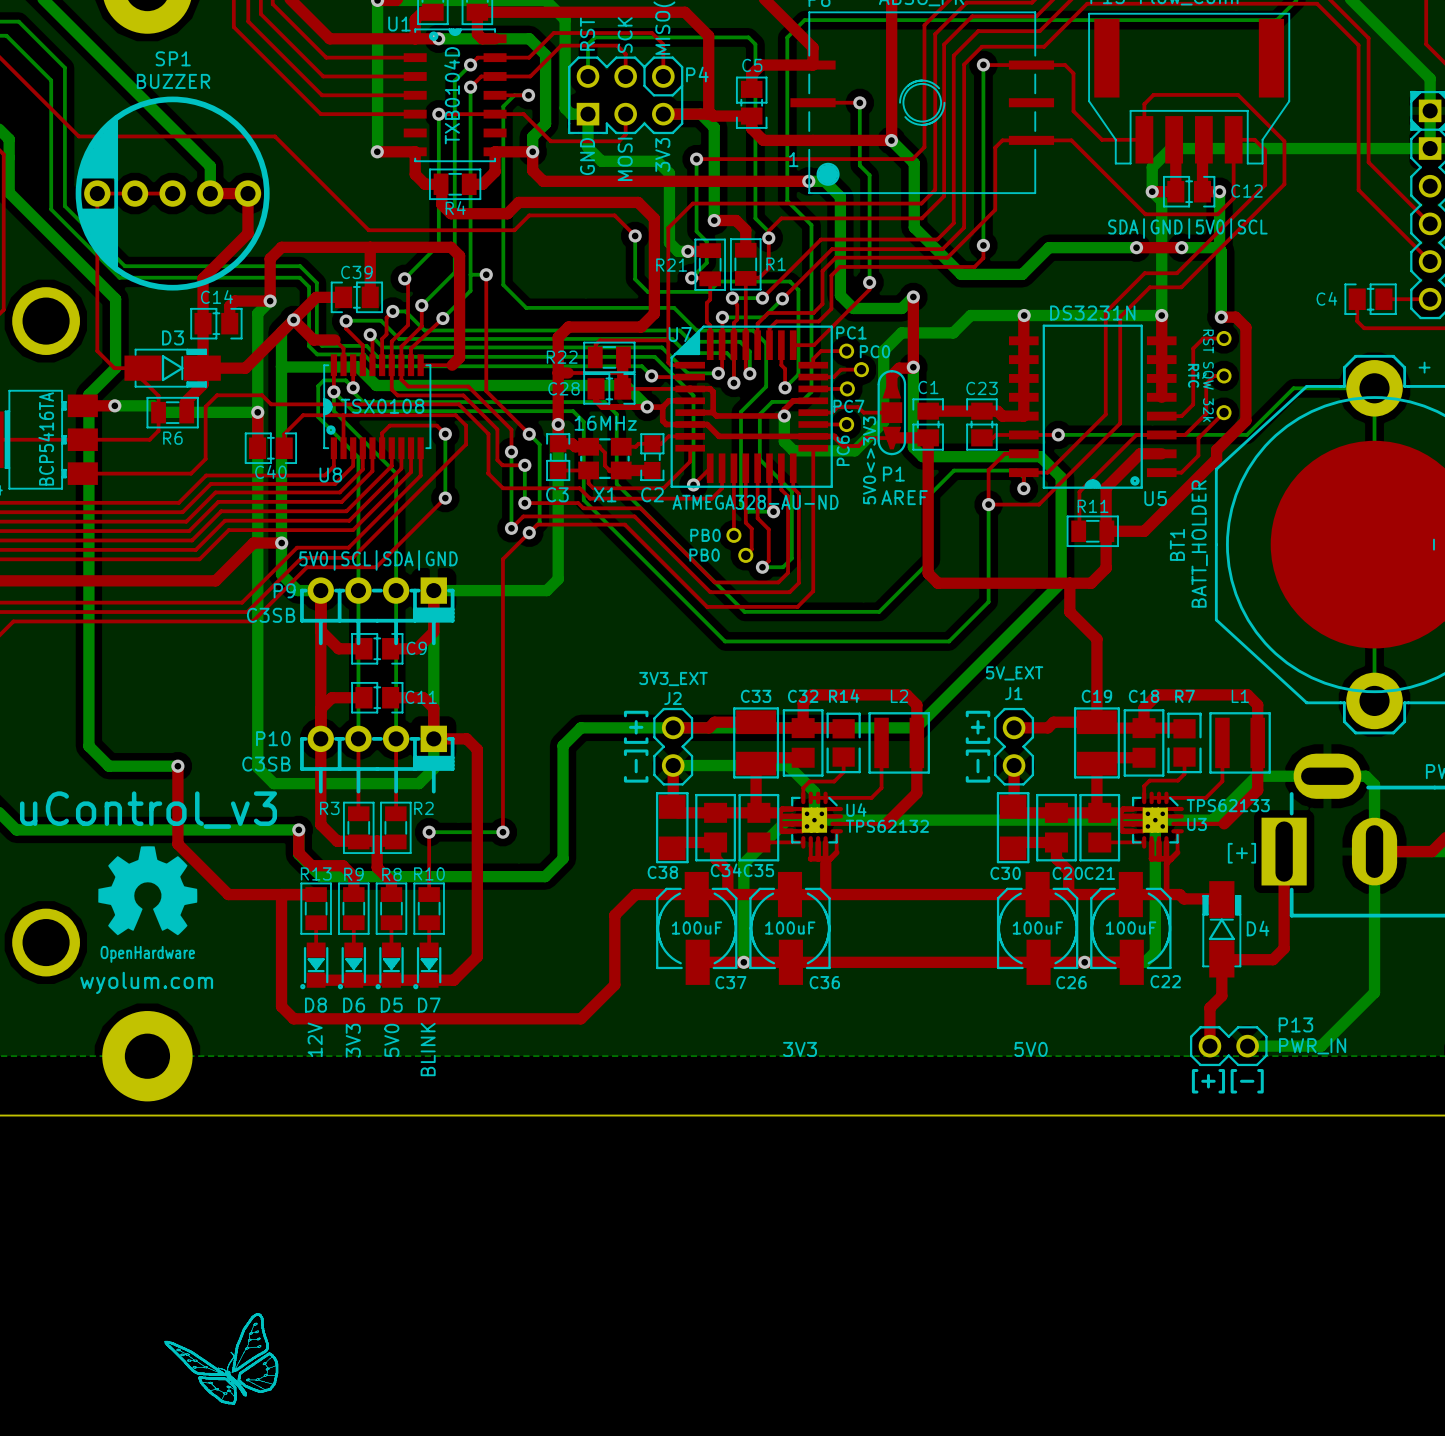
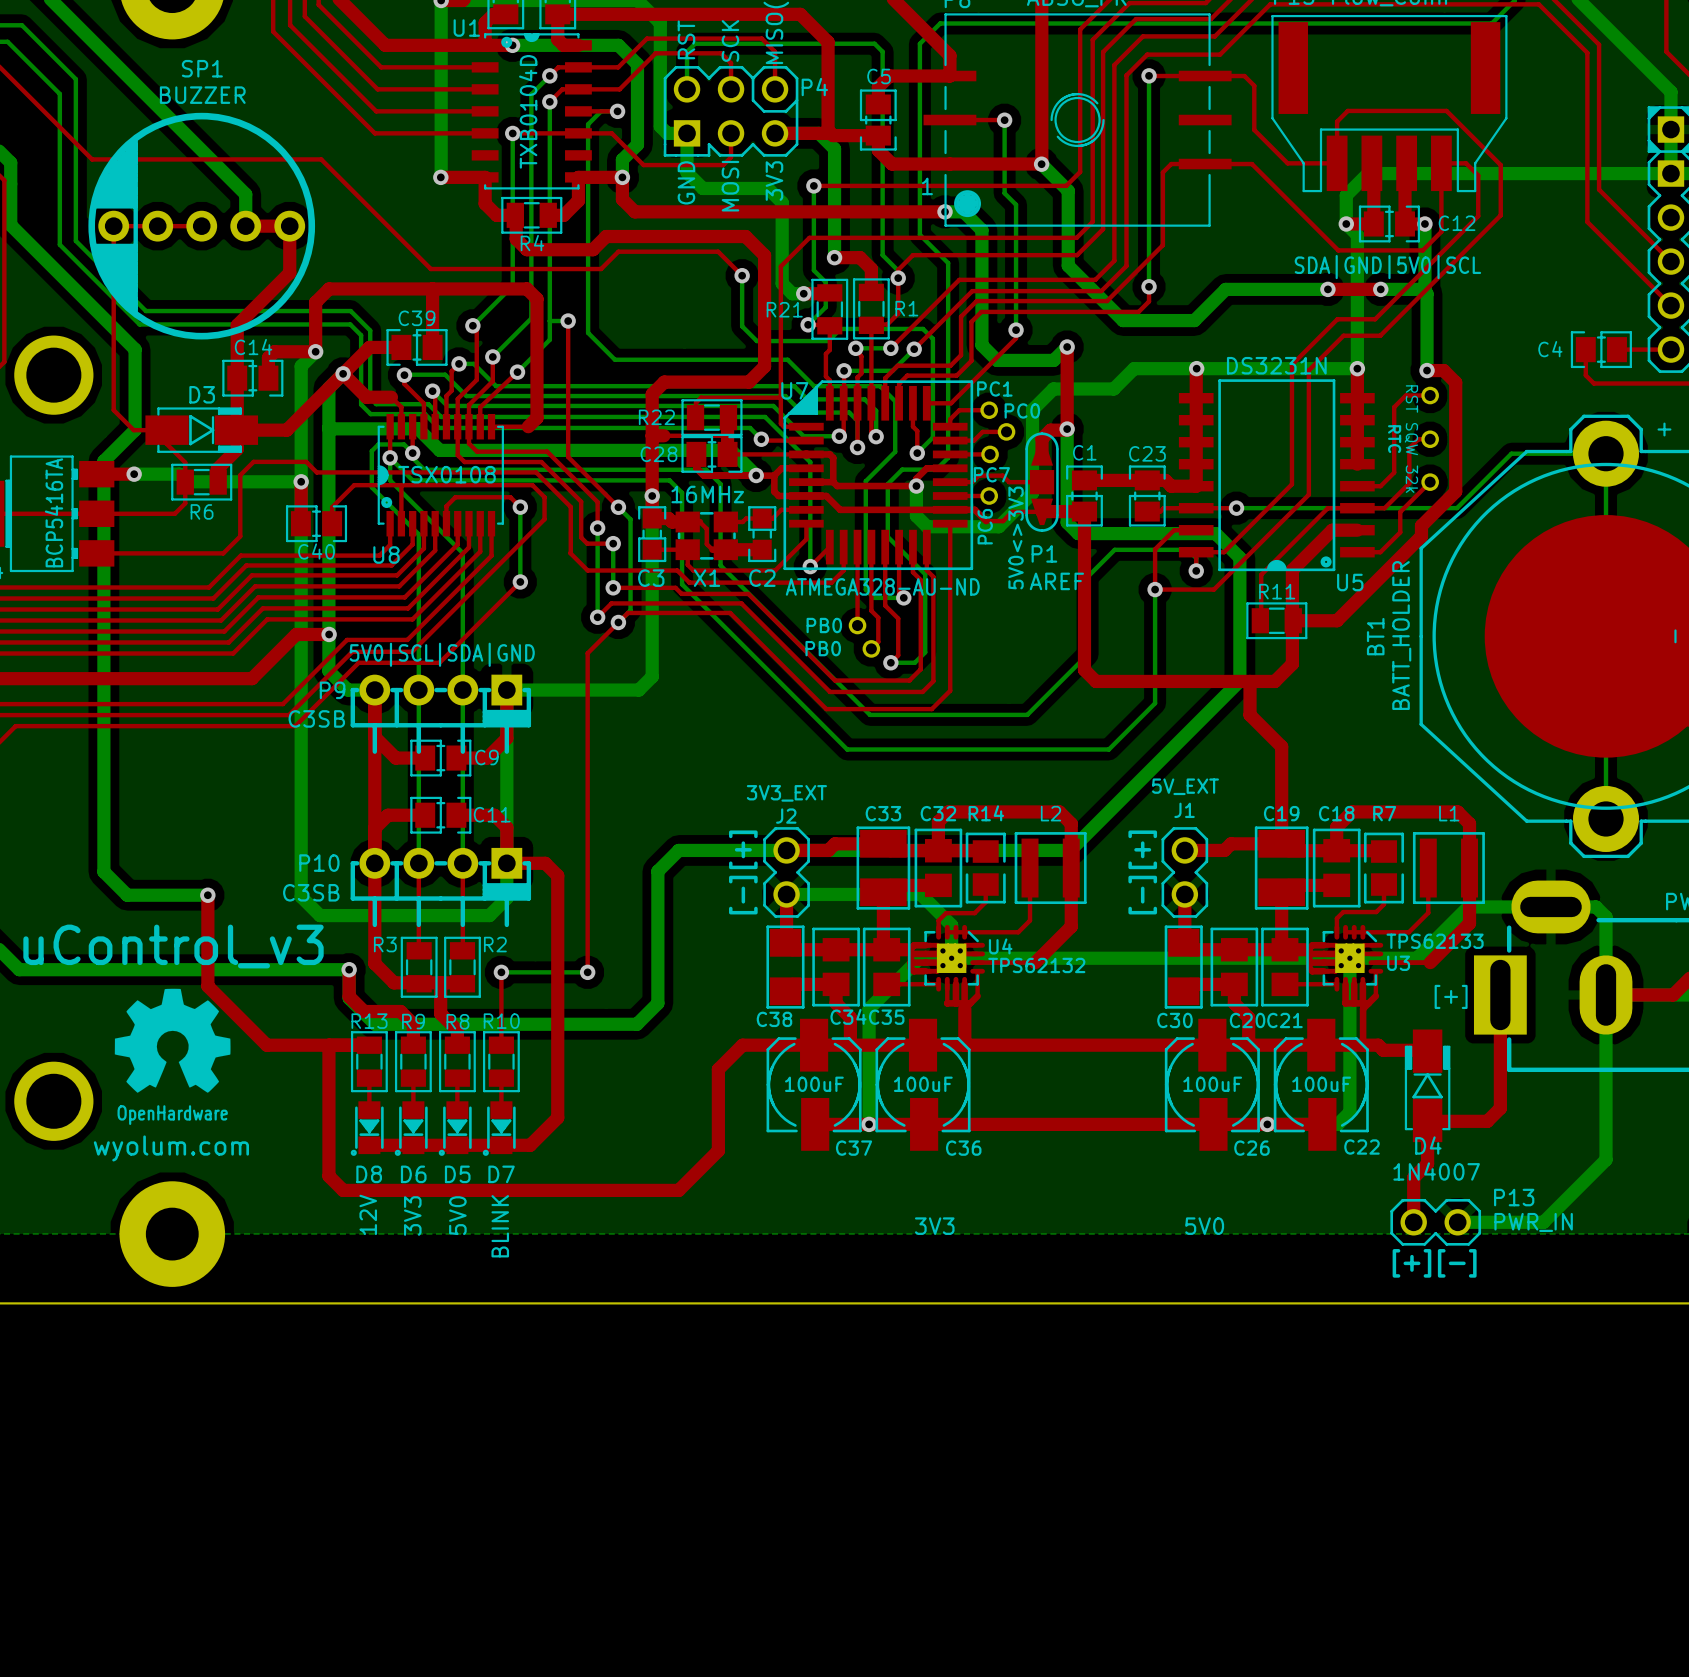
D4 name position: D4 (1258, 928) -> D4 (1428, 1145)
D4 value: none -> 1N4007 (1436, 1171)
drawing: [164, 1313, 279, 1405] -> none

